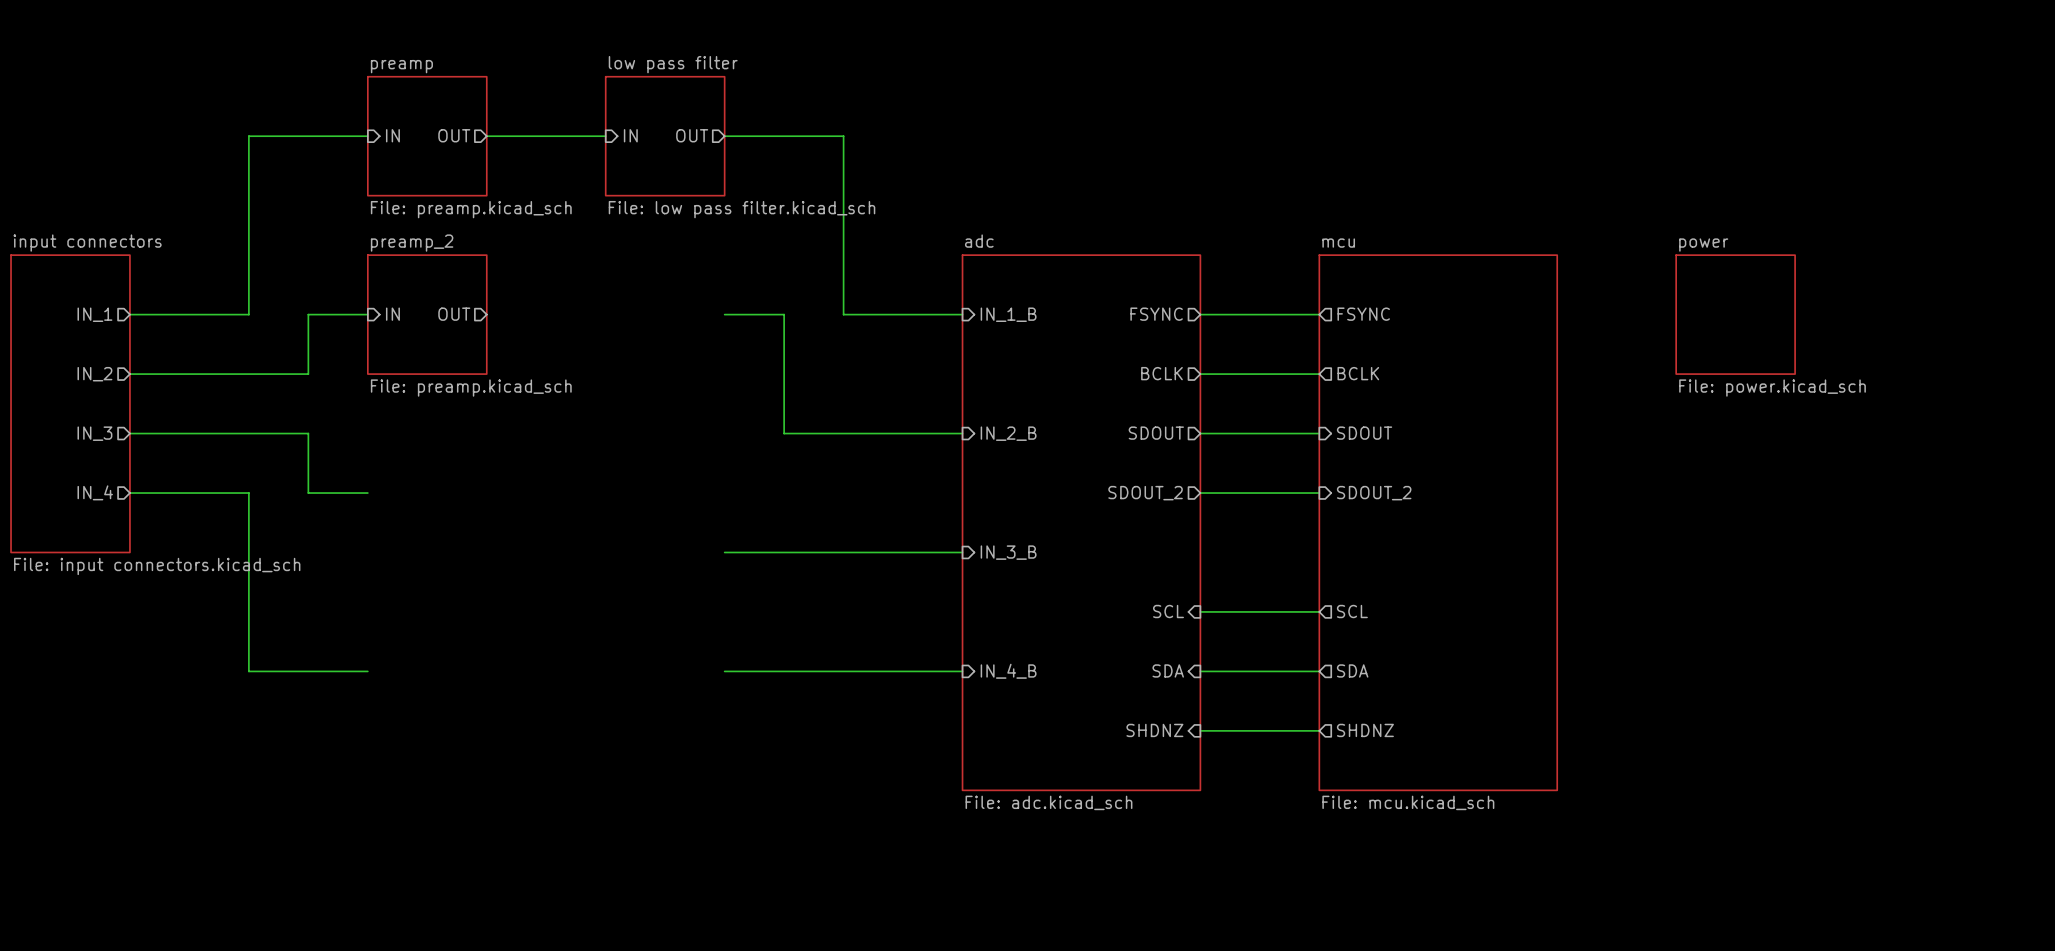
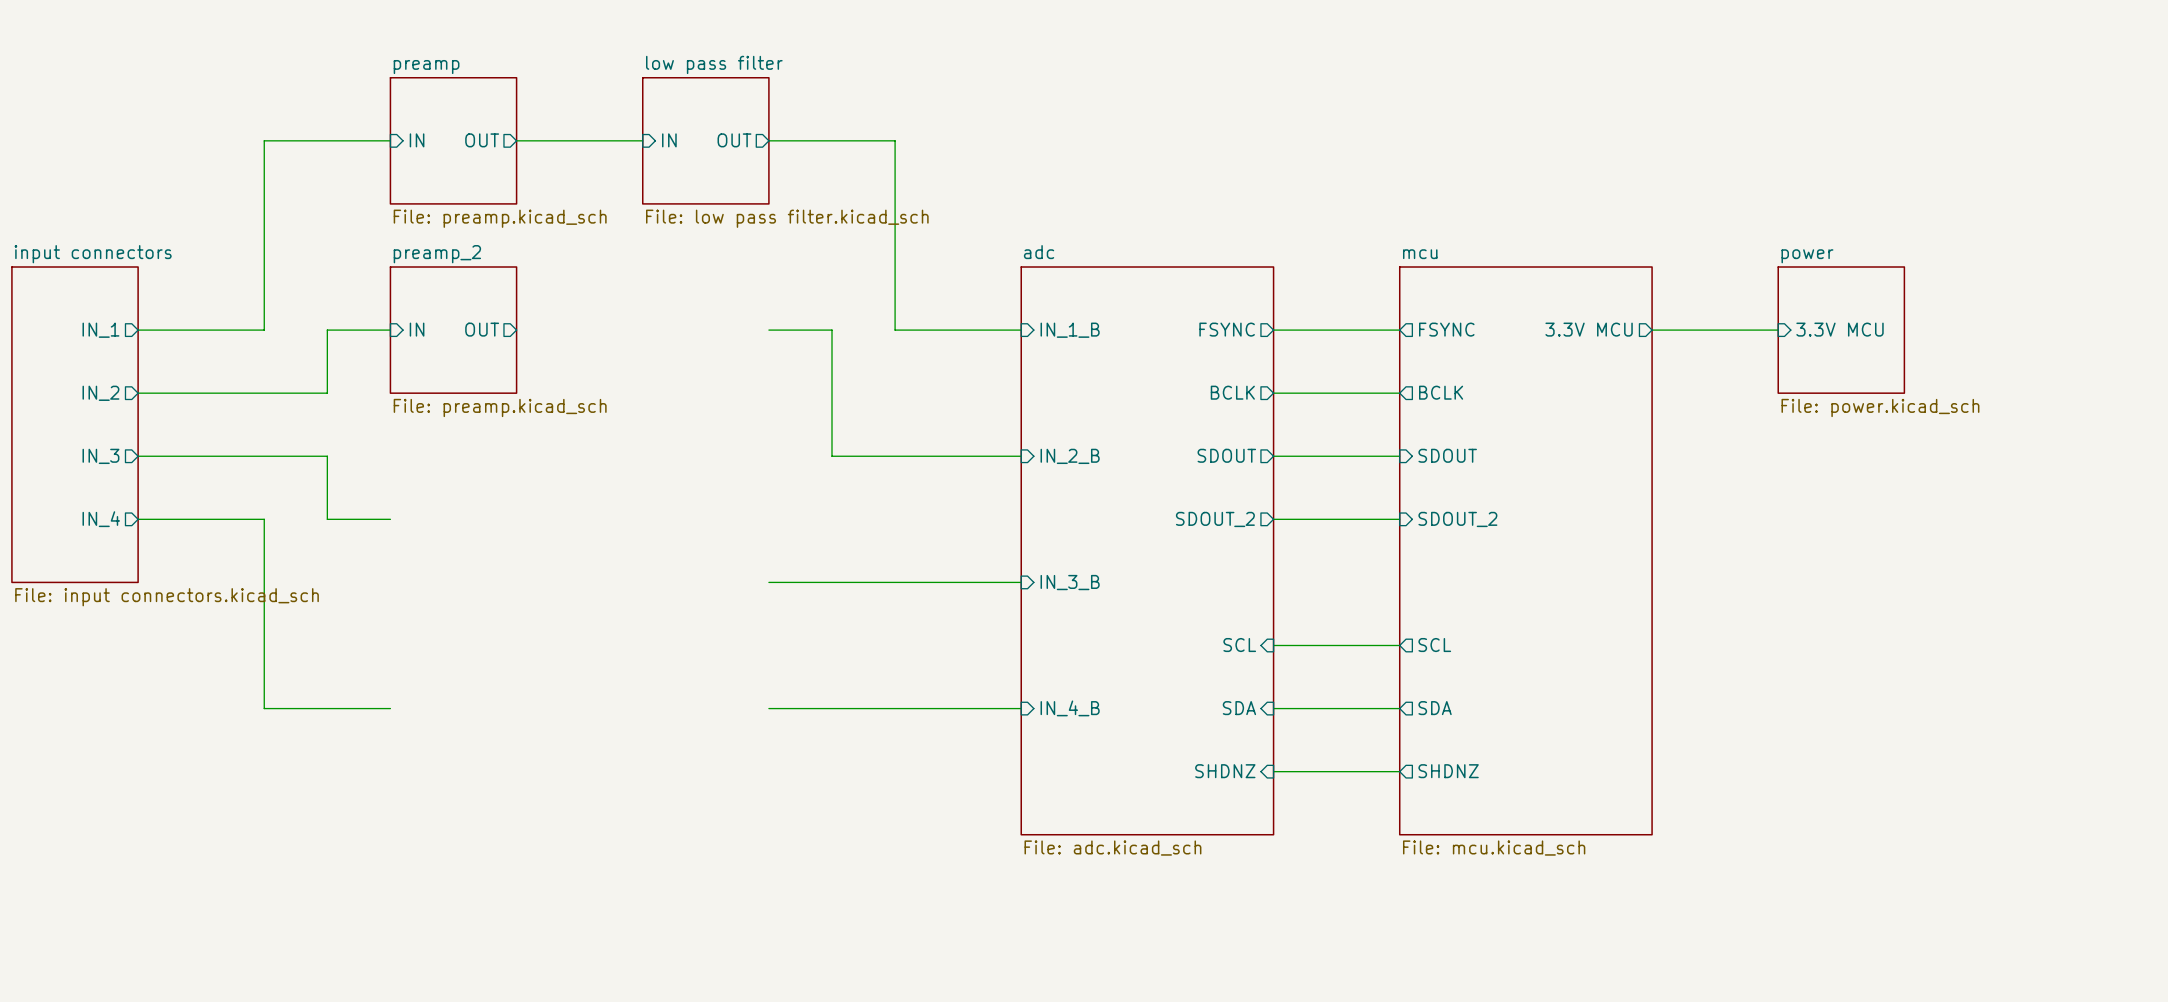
sheet pin: none -> 3.3V MCU (1589, 329)
wire: none -> (1652, 330) (1778, 330)
sheet pin: none -> 3.3V MCU (1840, 329)

